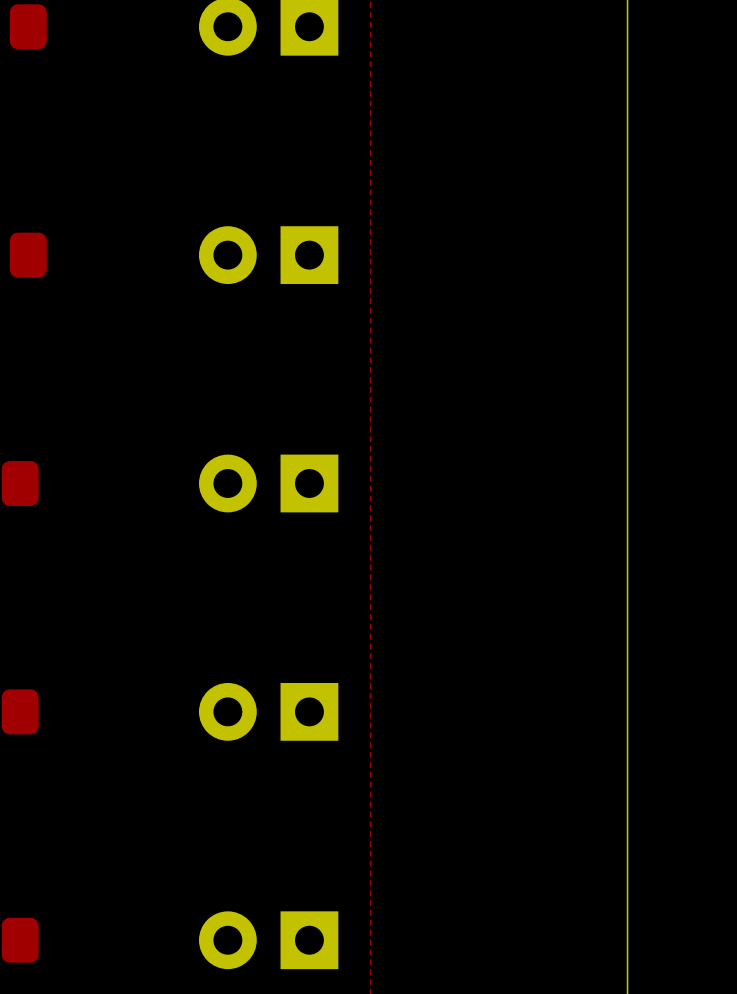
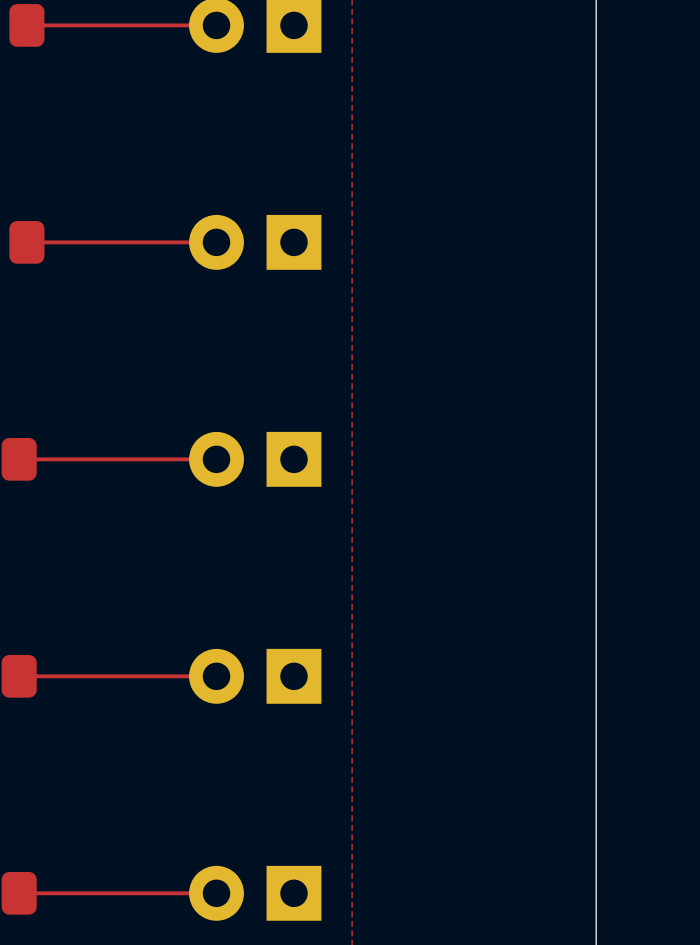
top track: none -> (216, 25) (26, 25)
top track: none -> (216, 242) (26, 242)
top track: none -> (216, 459) (19, 459)
top track: none -> (216, 676) (19, 676)
top track: none -> (216, 893) (19, 893)

